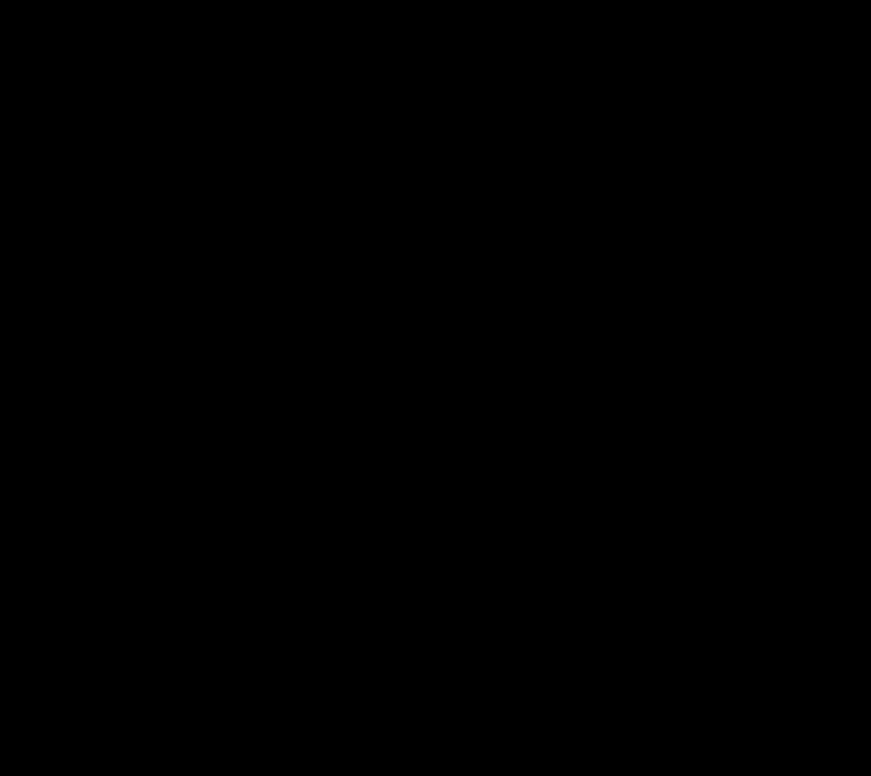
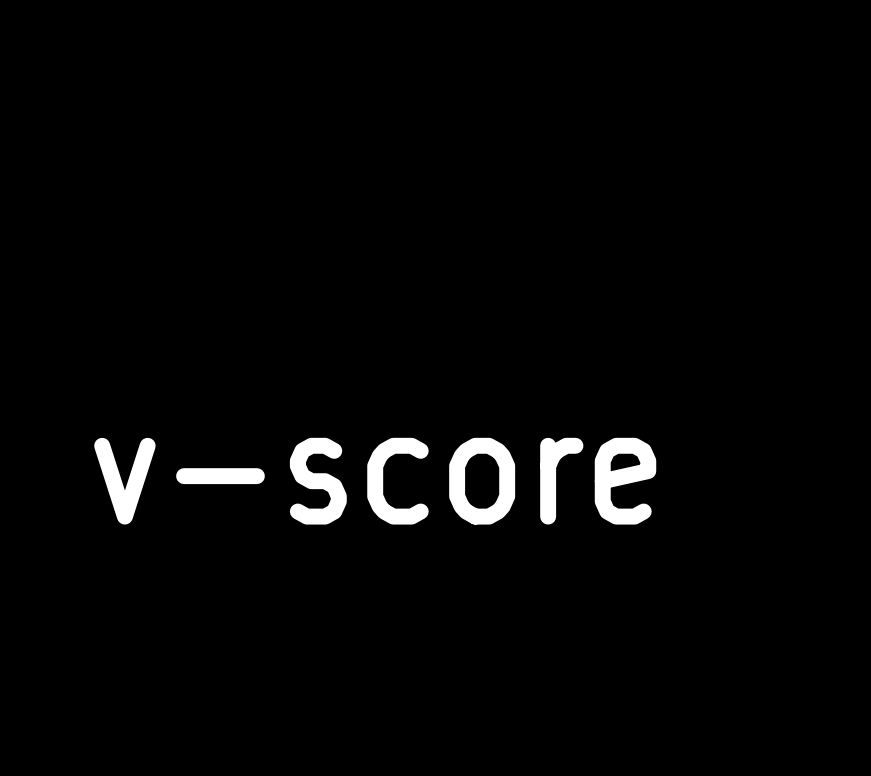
text: none -> v-score (375, 481)

